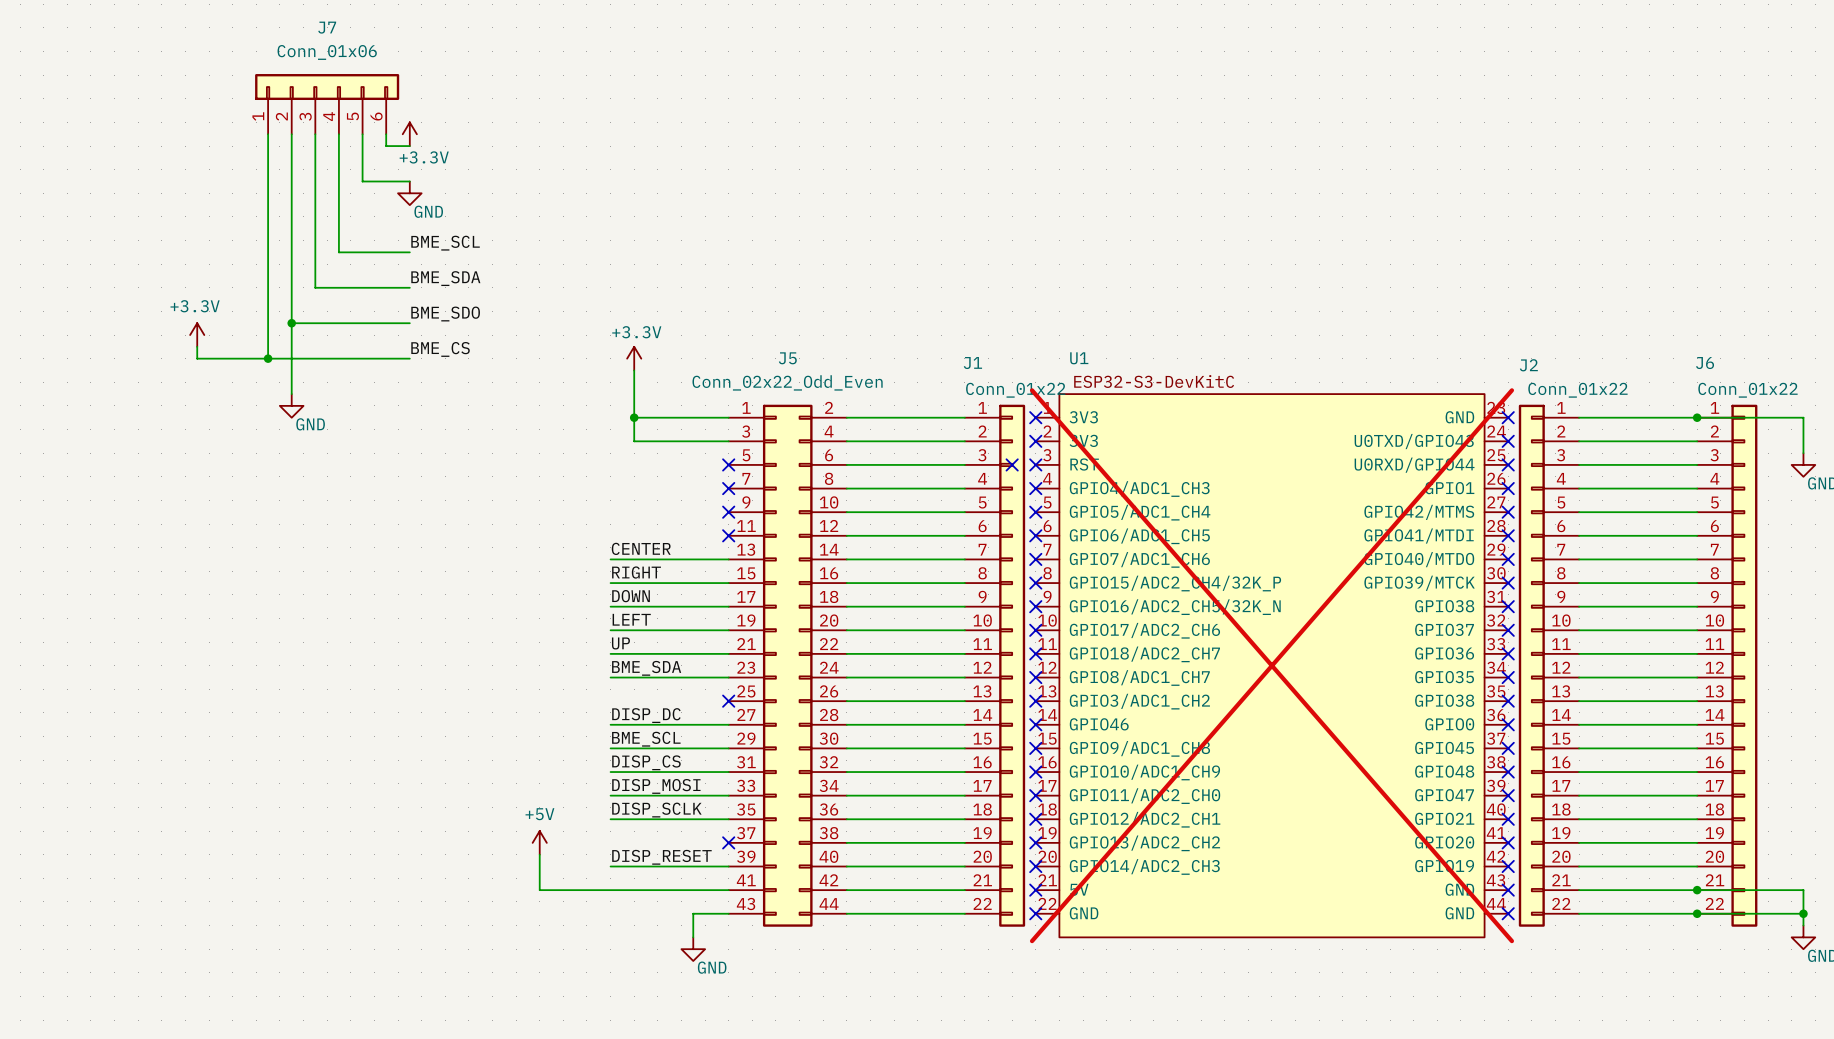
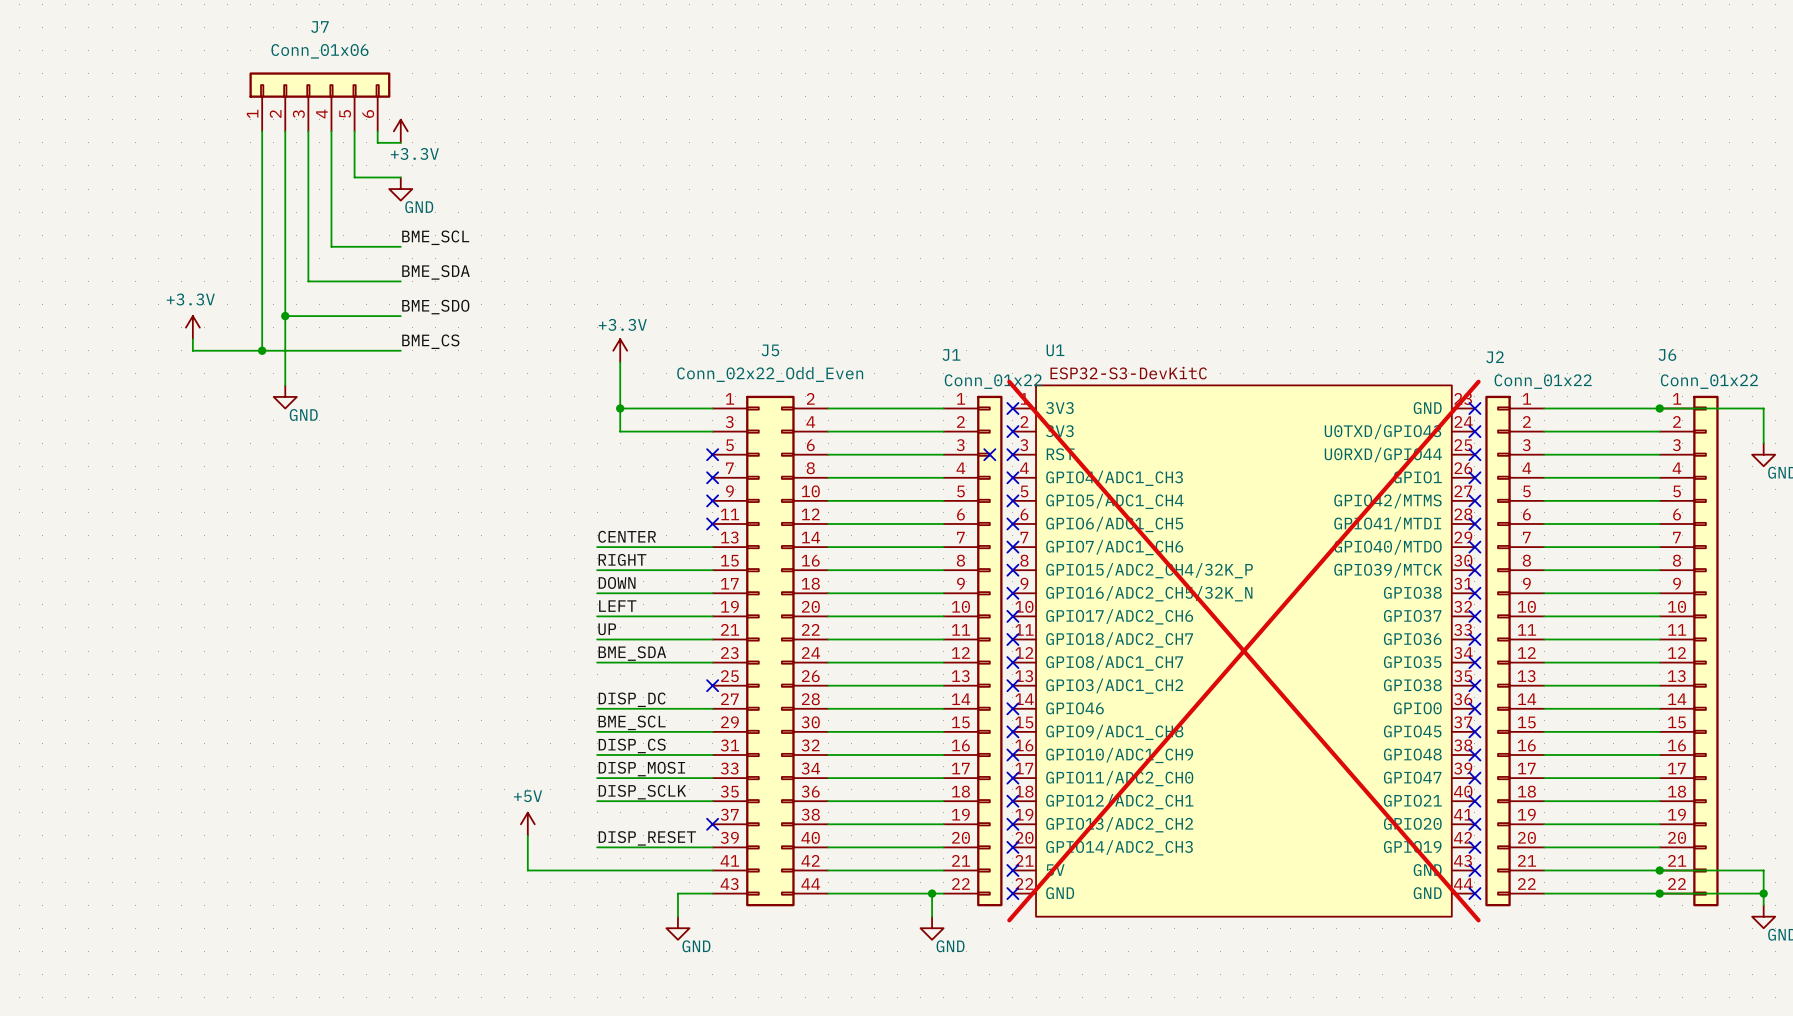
wire: none -> (932, 893) (932, 916)
junction: none -> (932, 893)
power symbol: none -> GND (932, 928)

